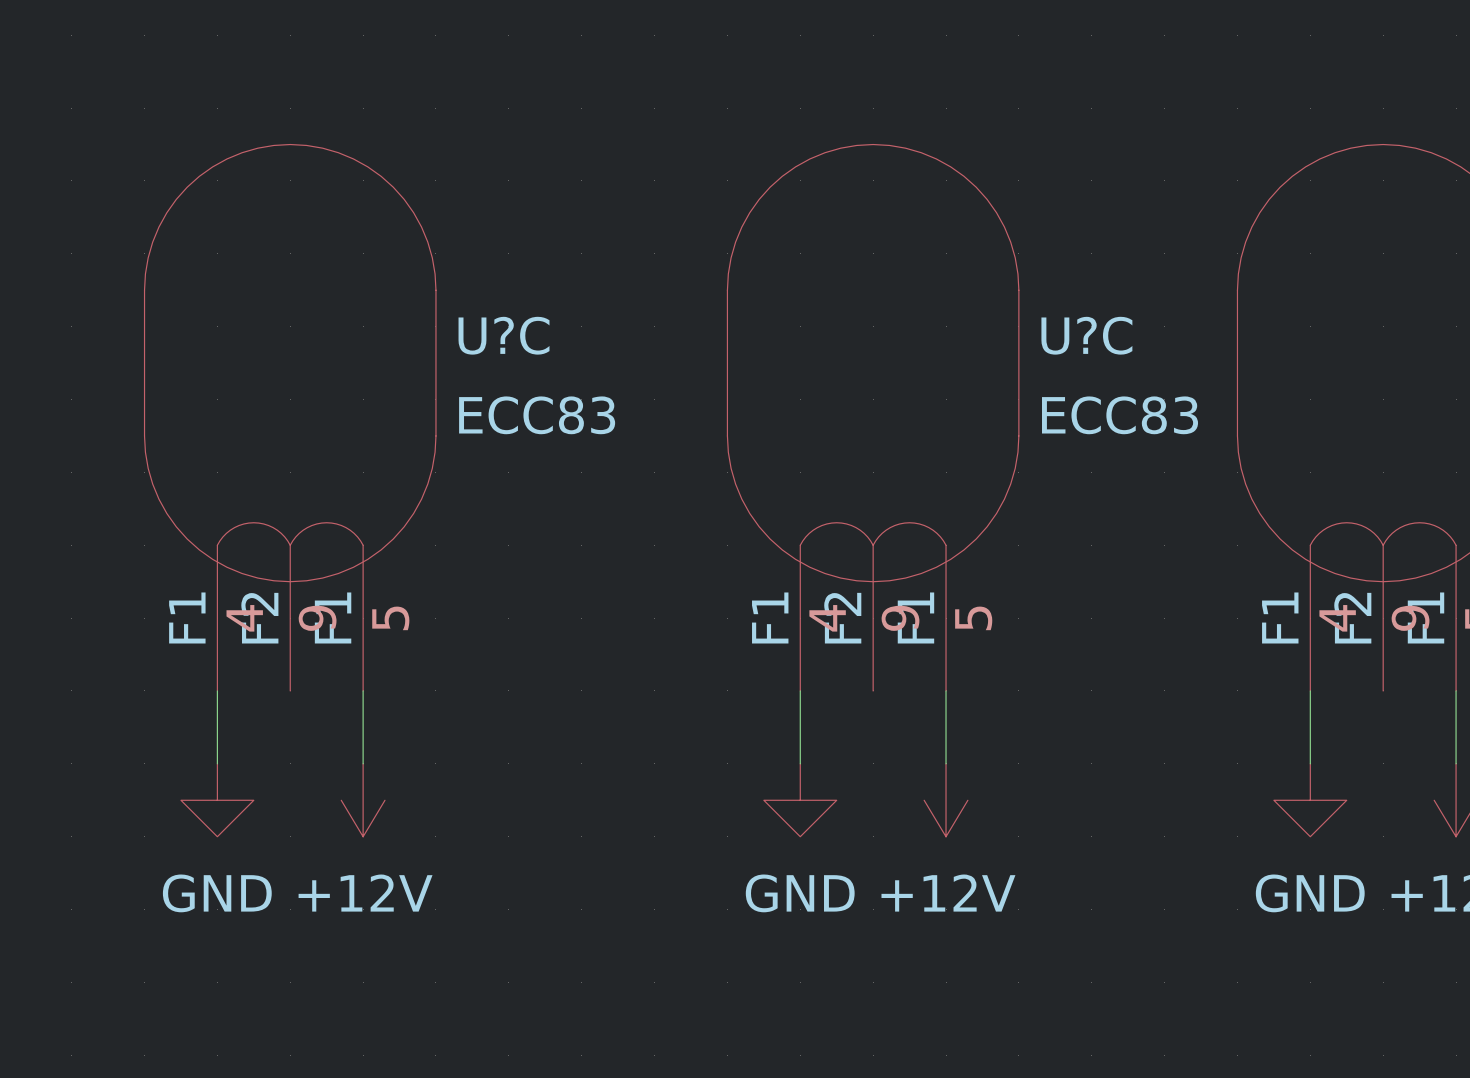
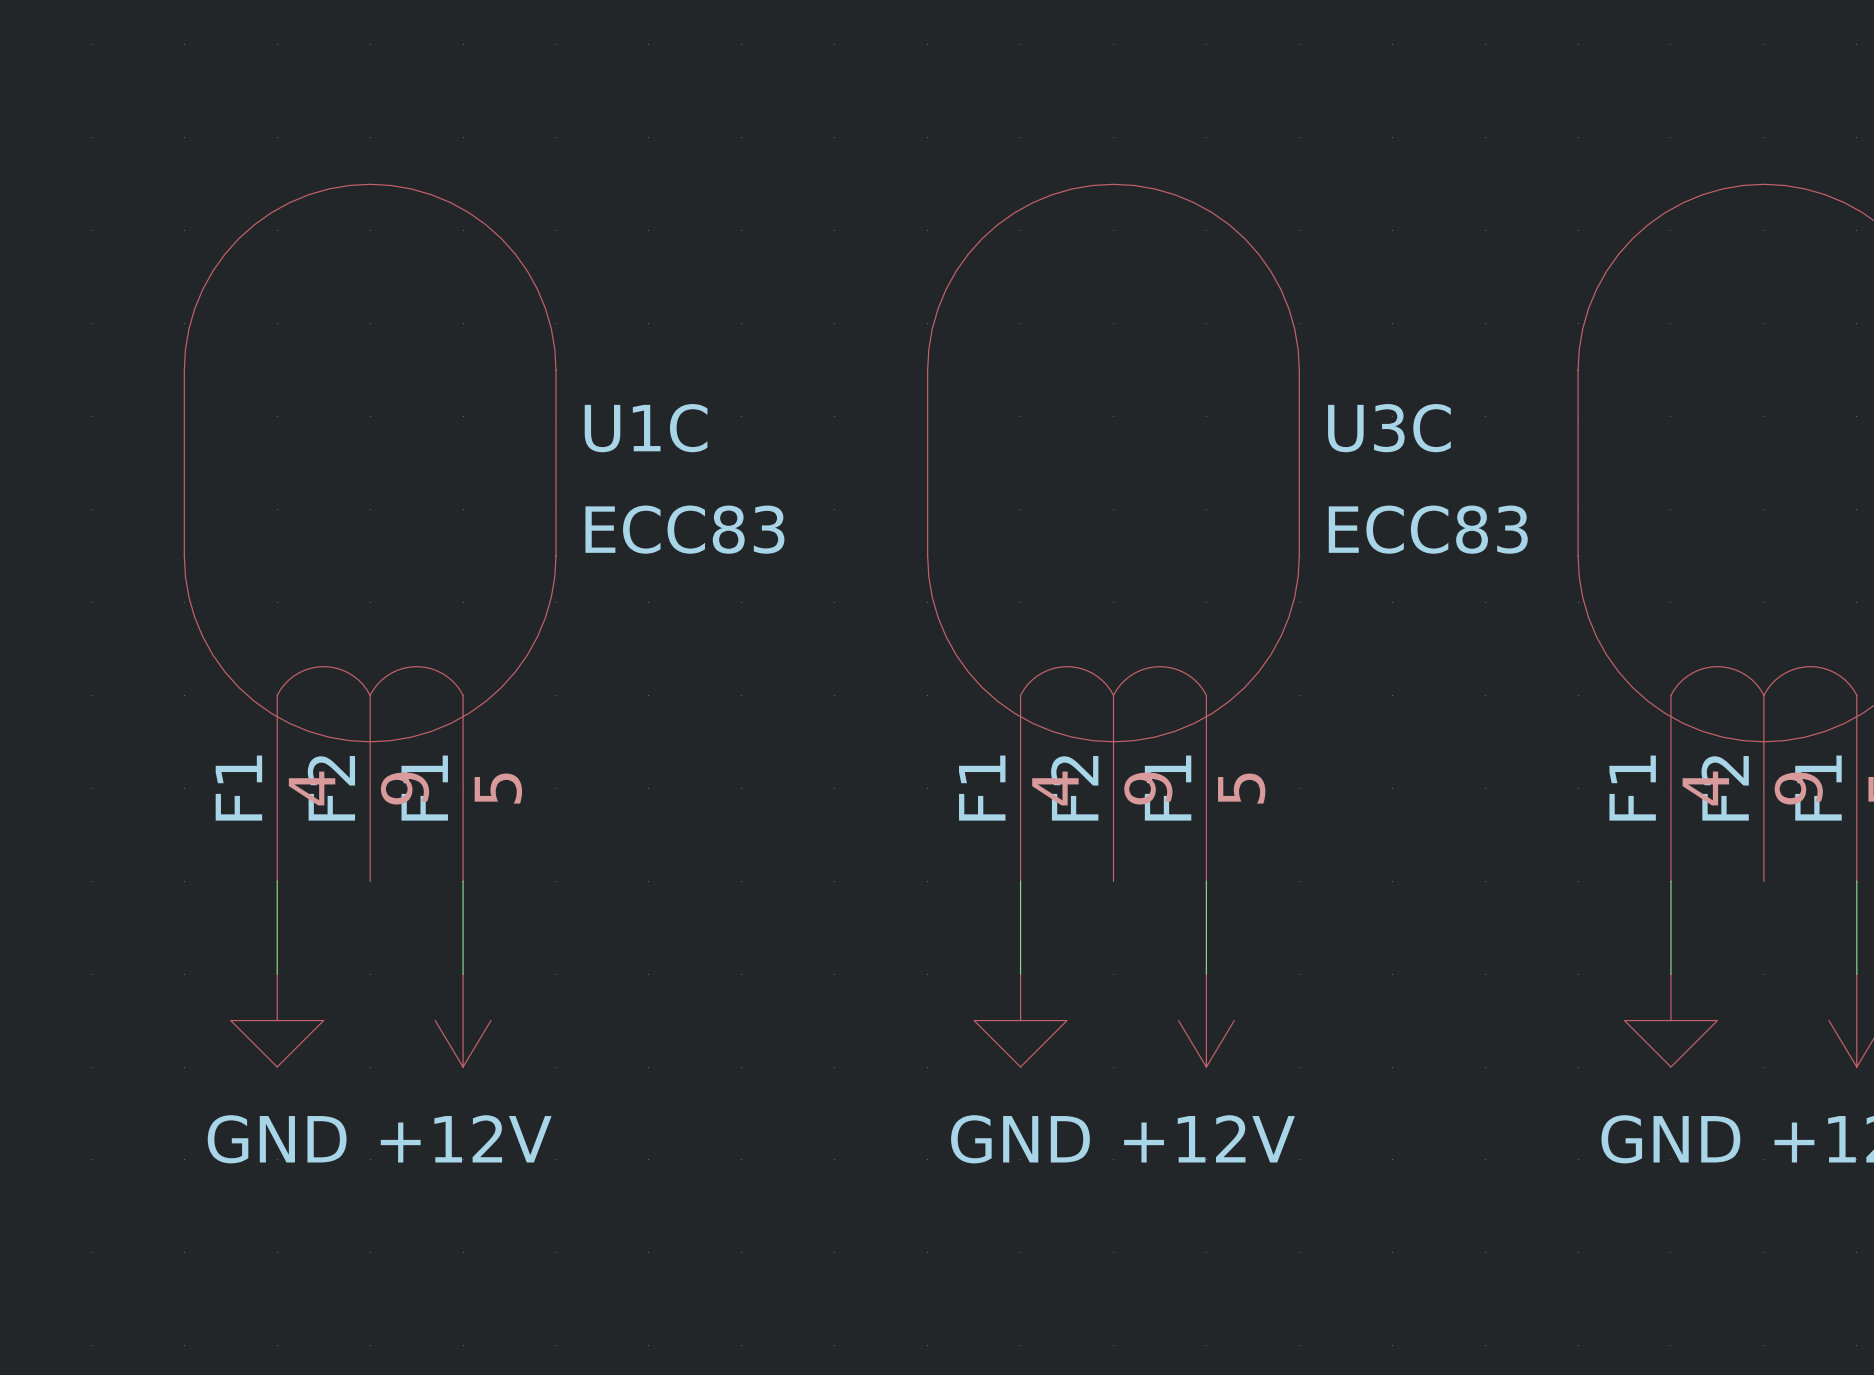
U?C name: U?C (504, 335) -> U1C (646, 428)
U?C name: U?C (1086, 335) -> U3C (1389, 428)

